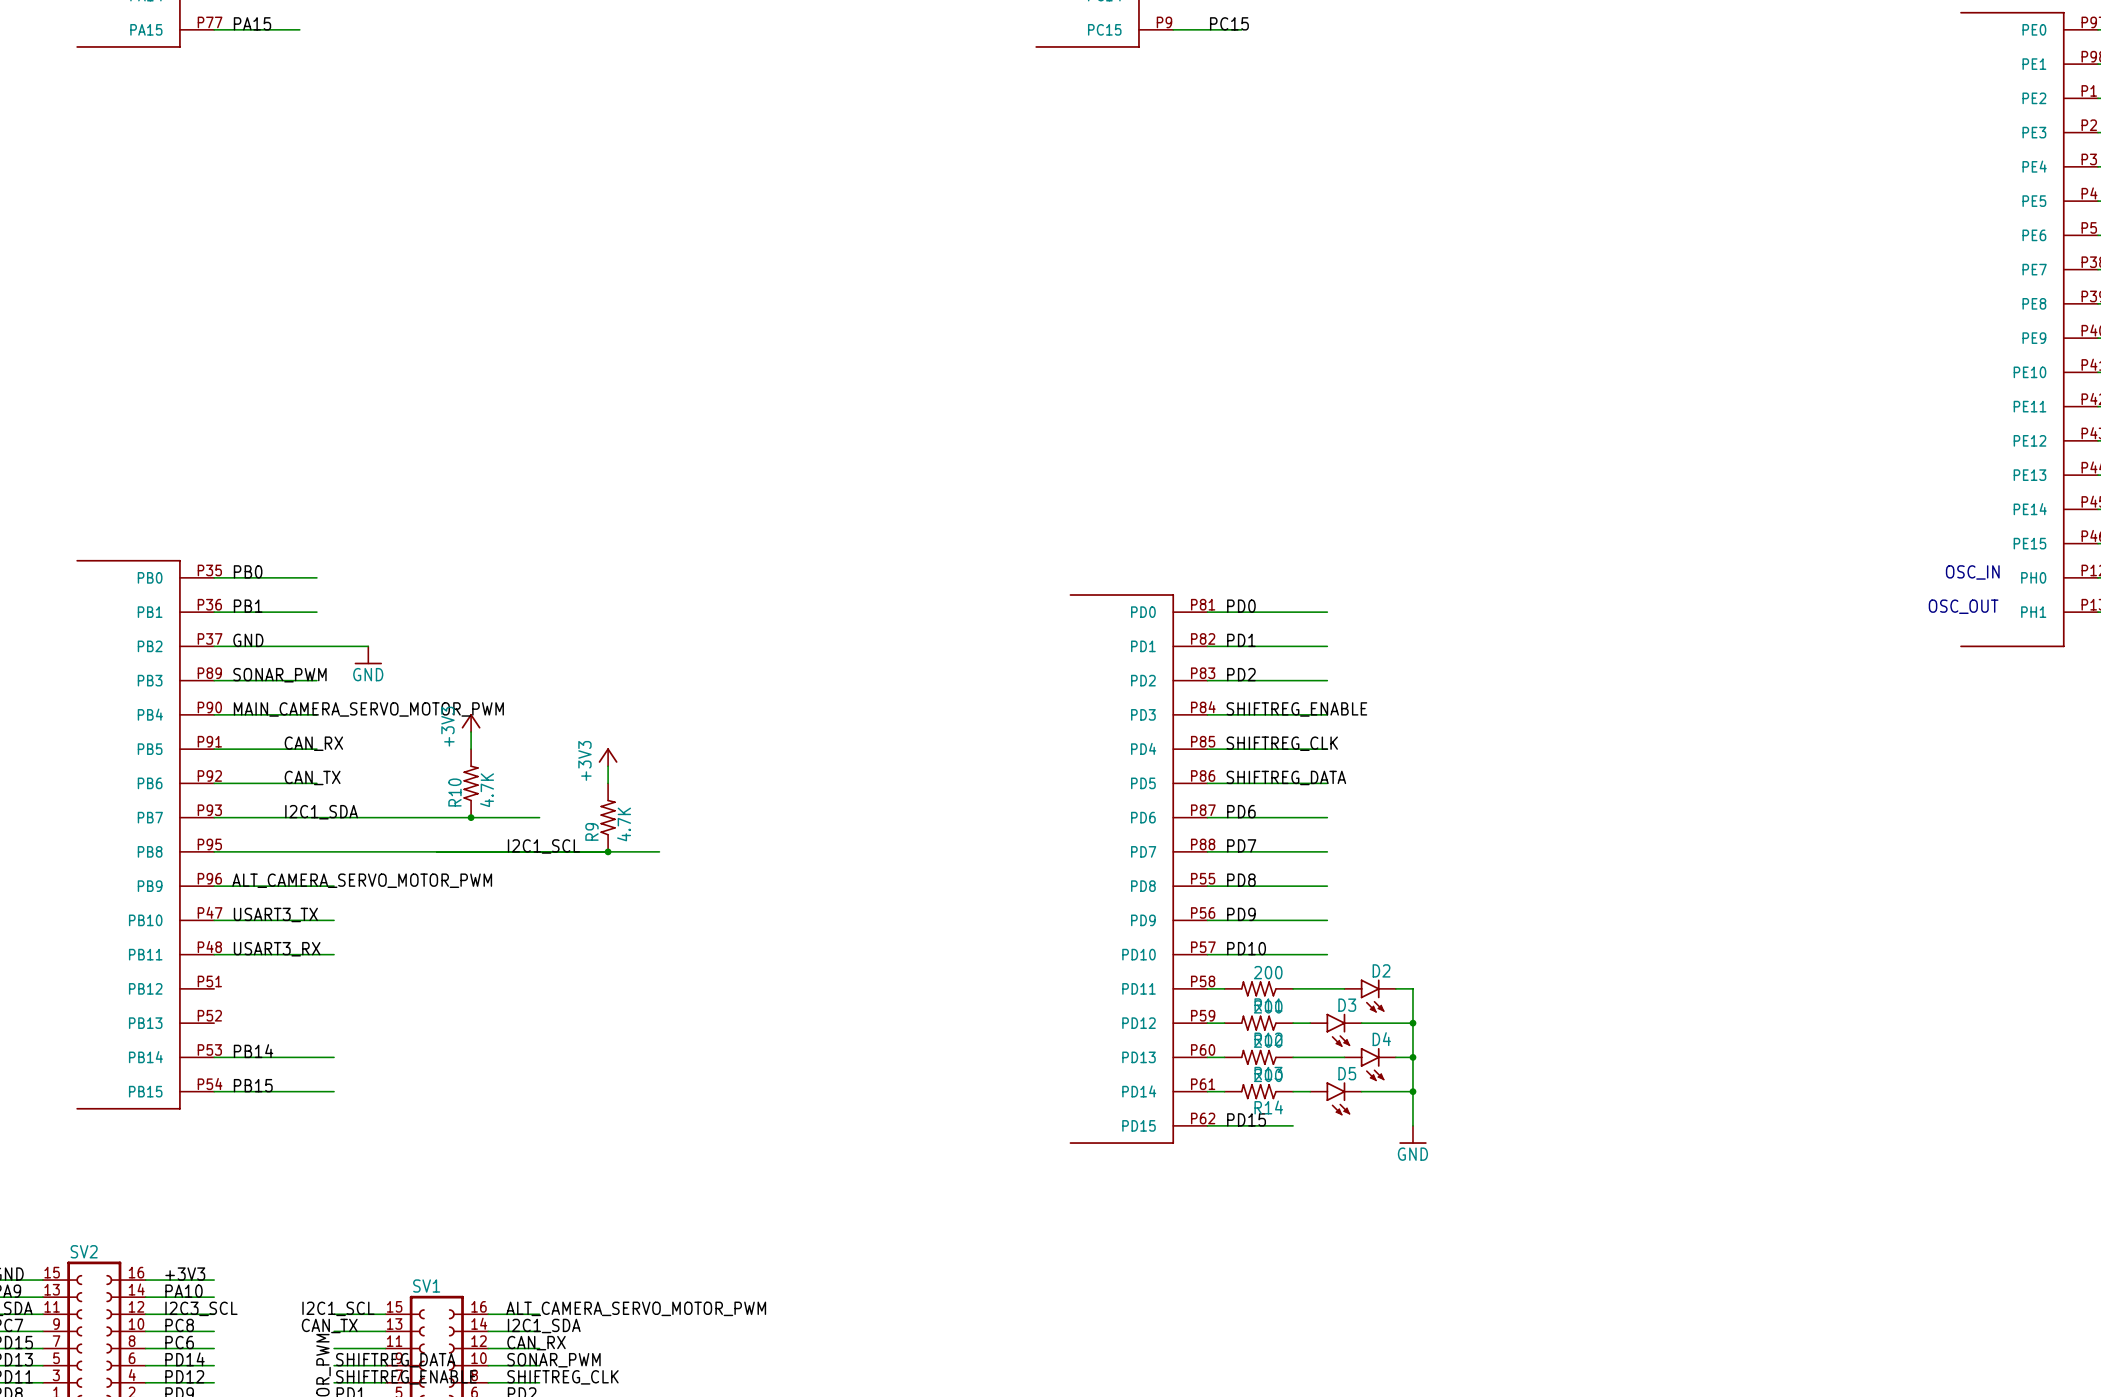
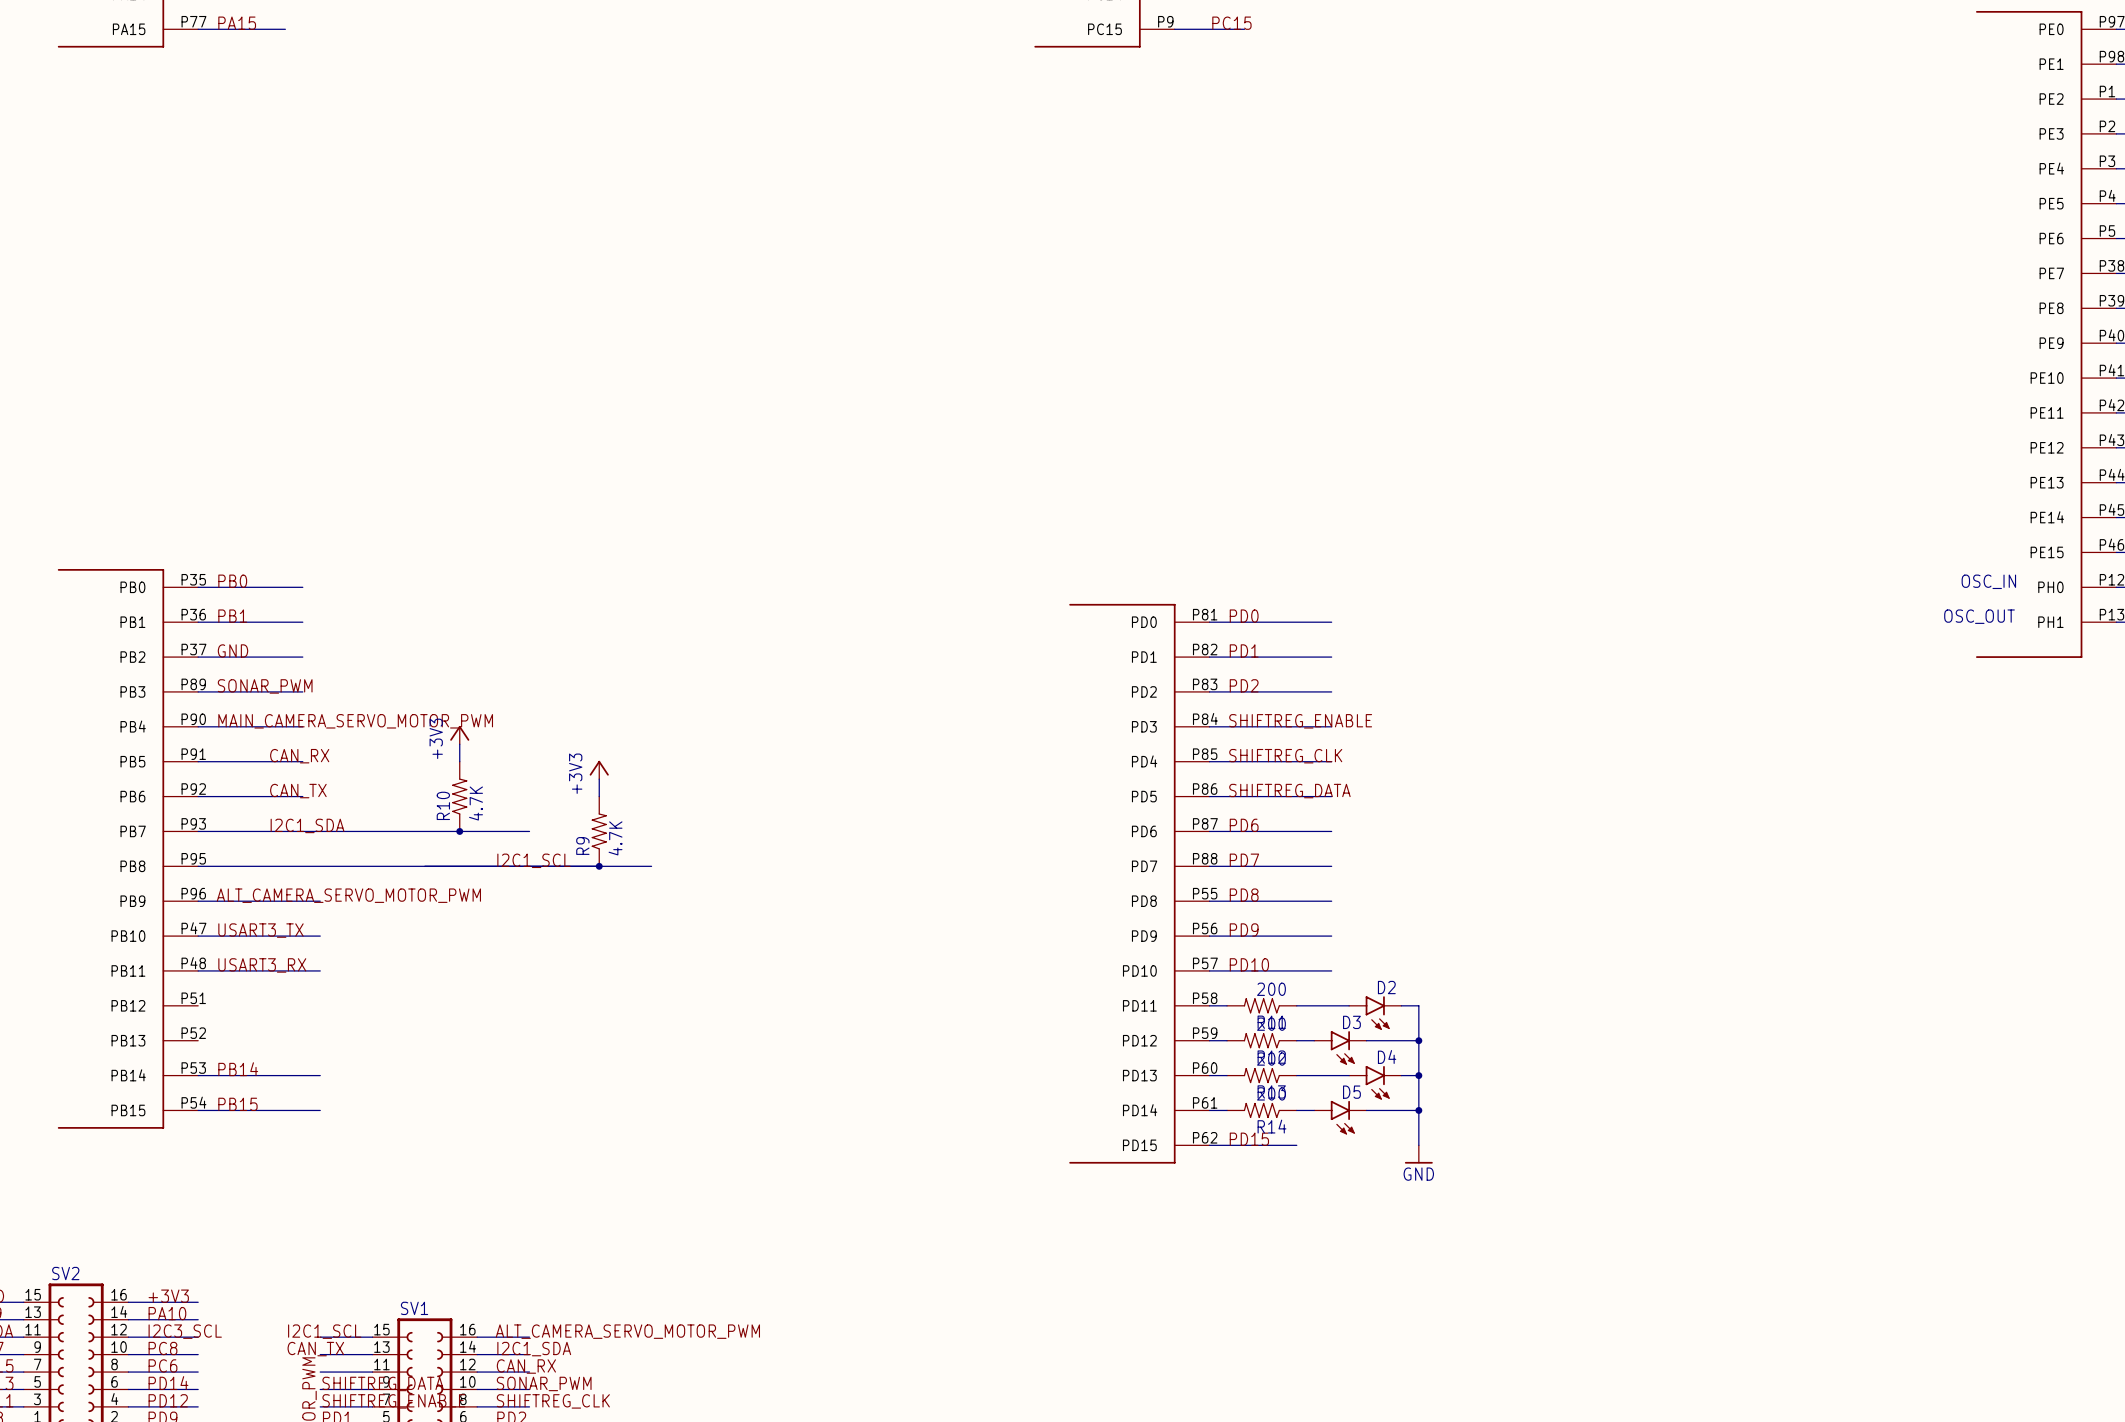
wire: (316, 646) (368, 646) -> none
power symbol: GND (368, 655) -> none

